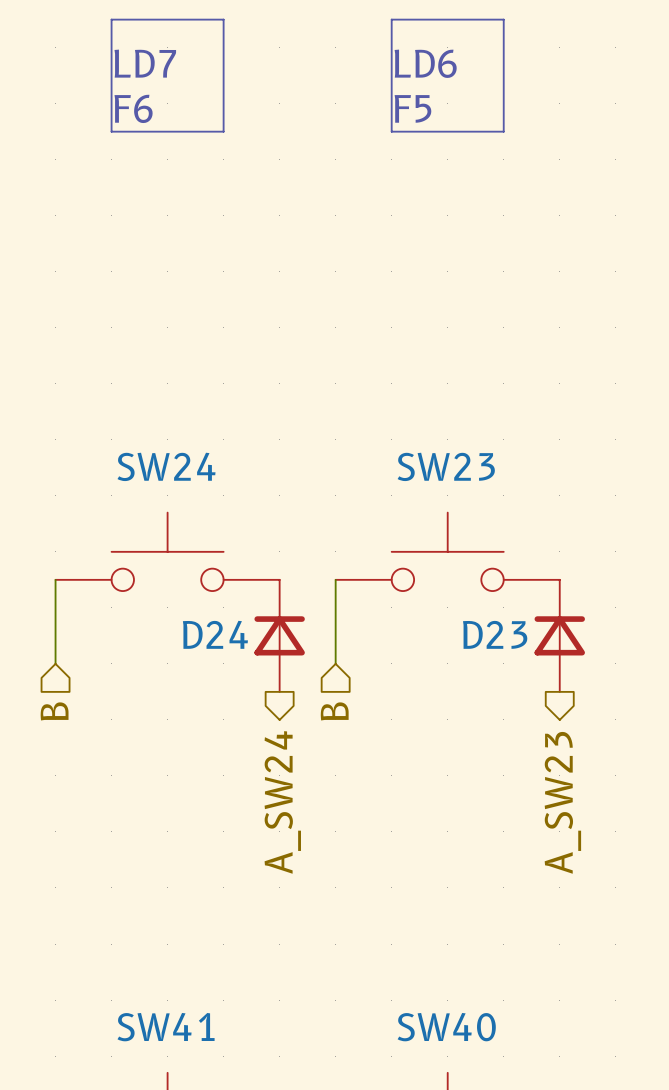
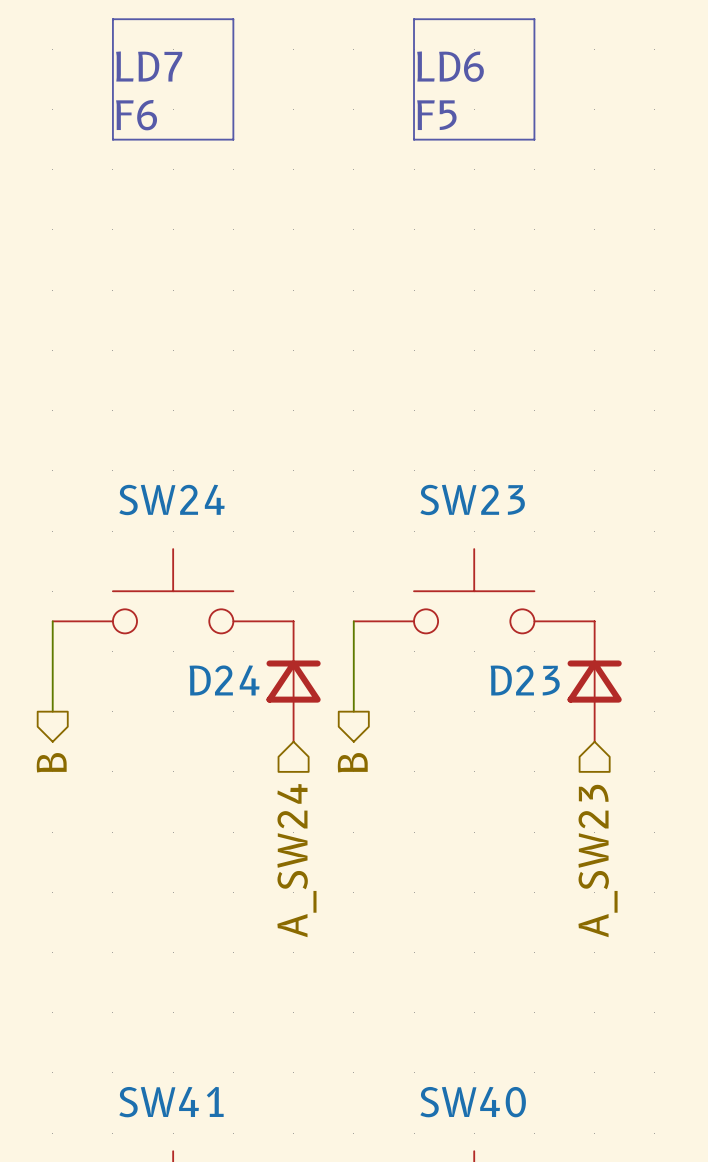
hierarchical label shape: input (54, 711) -> output (51, 762)
hierarchical label shape: input (334, 711) -> output (352, 762)
hierarchical label shape: output (282, 802) -> input (296, 860)
hierarchical label shape: output (562, 802) -> input (598, 861)

